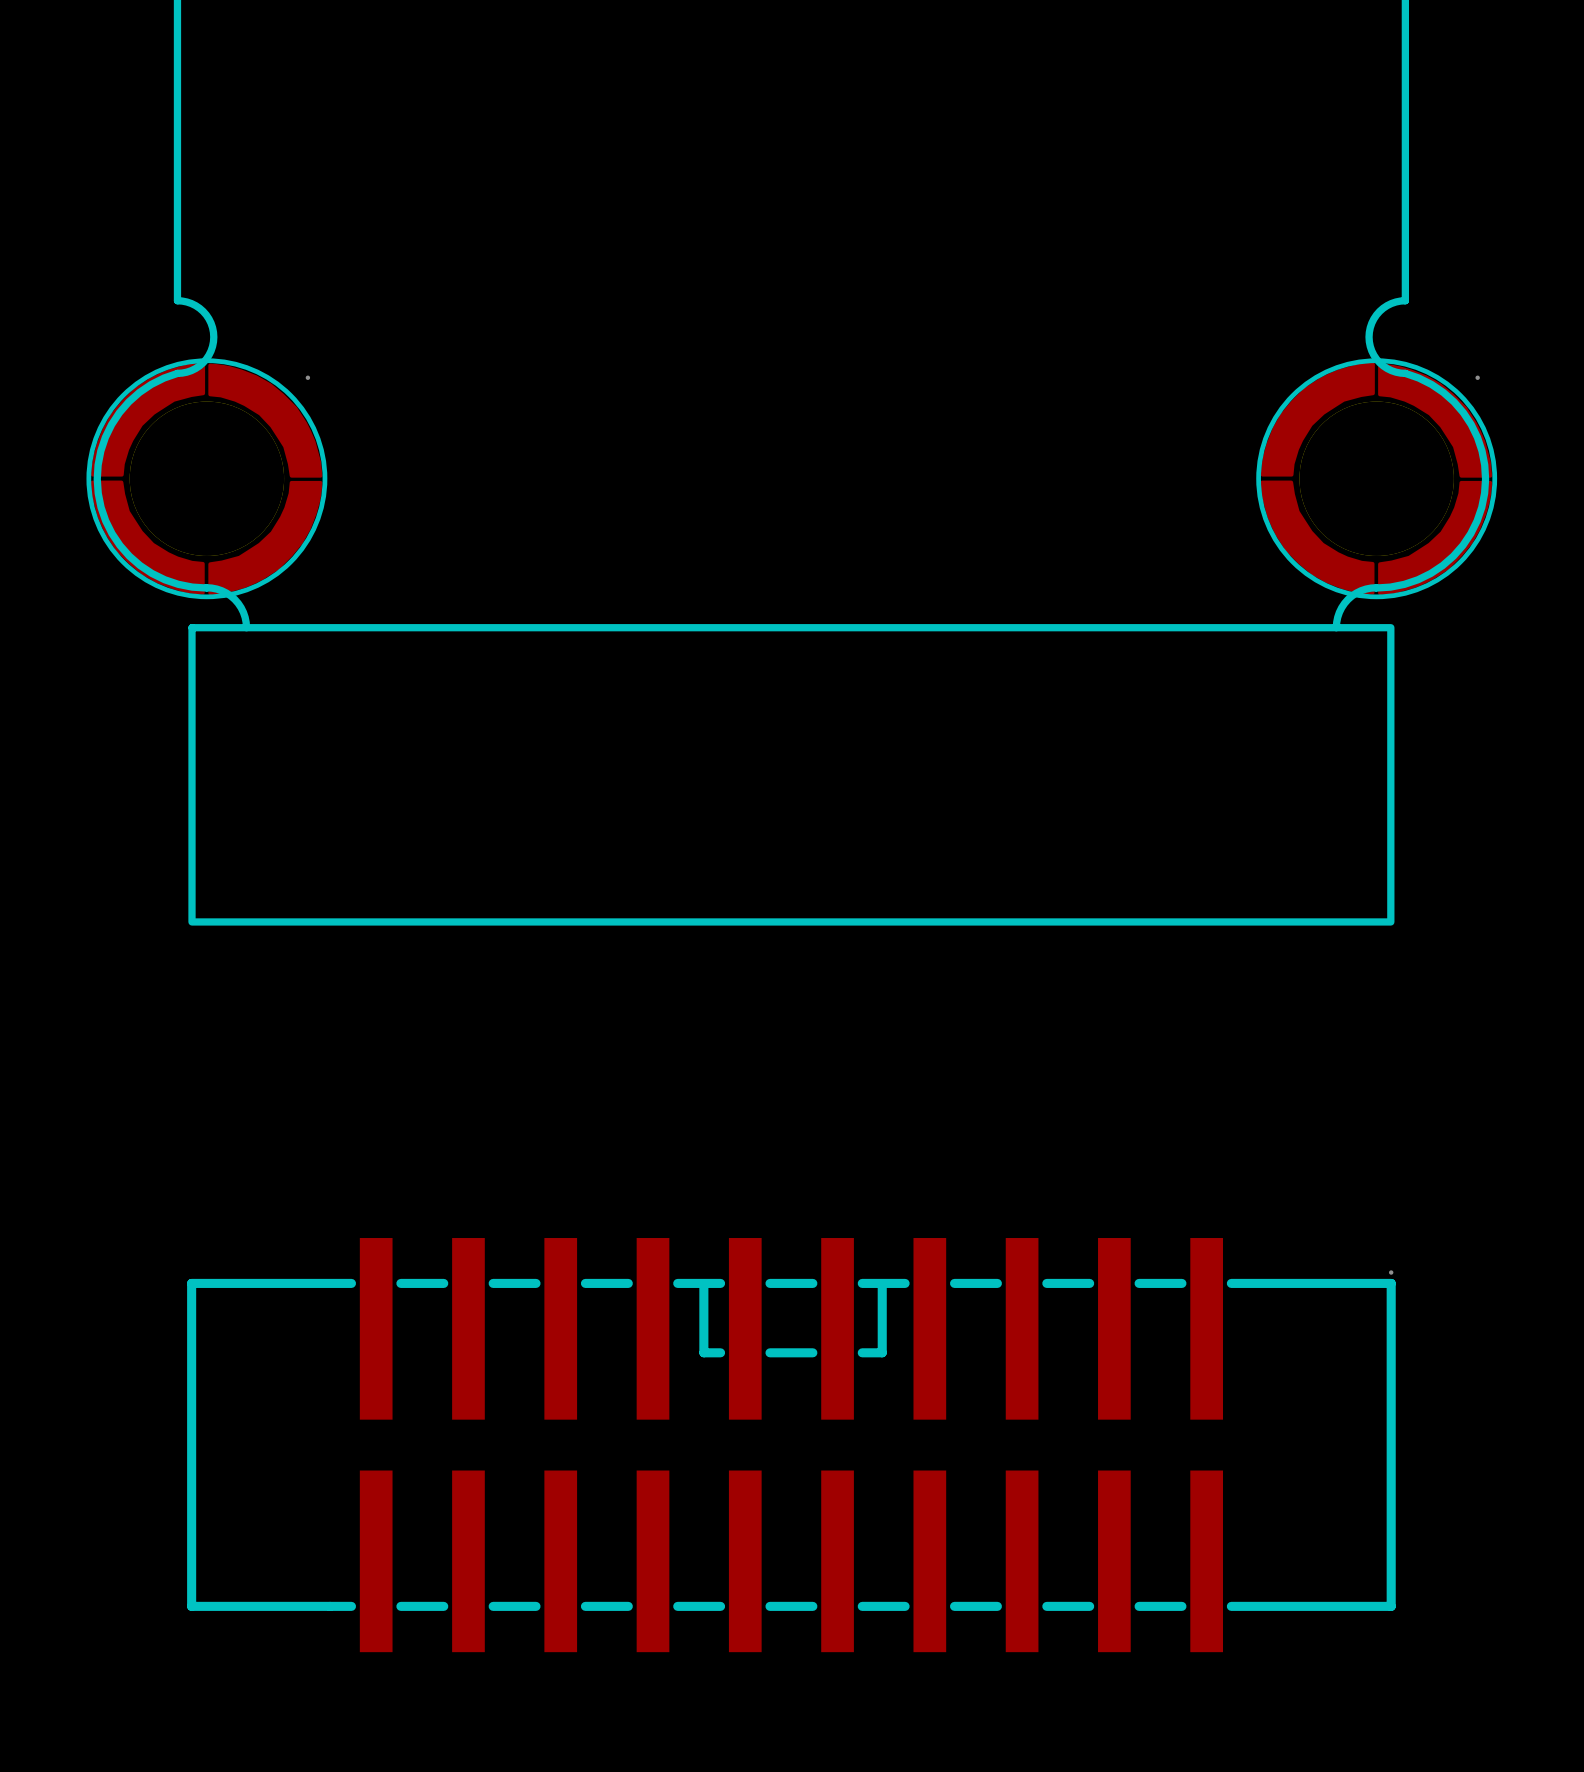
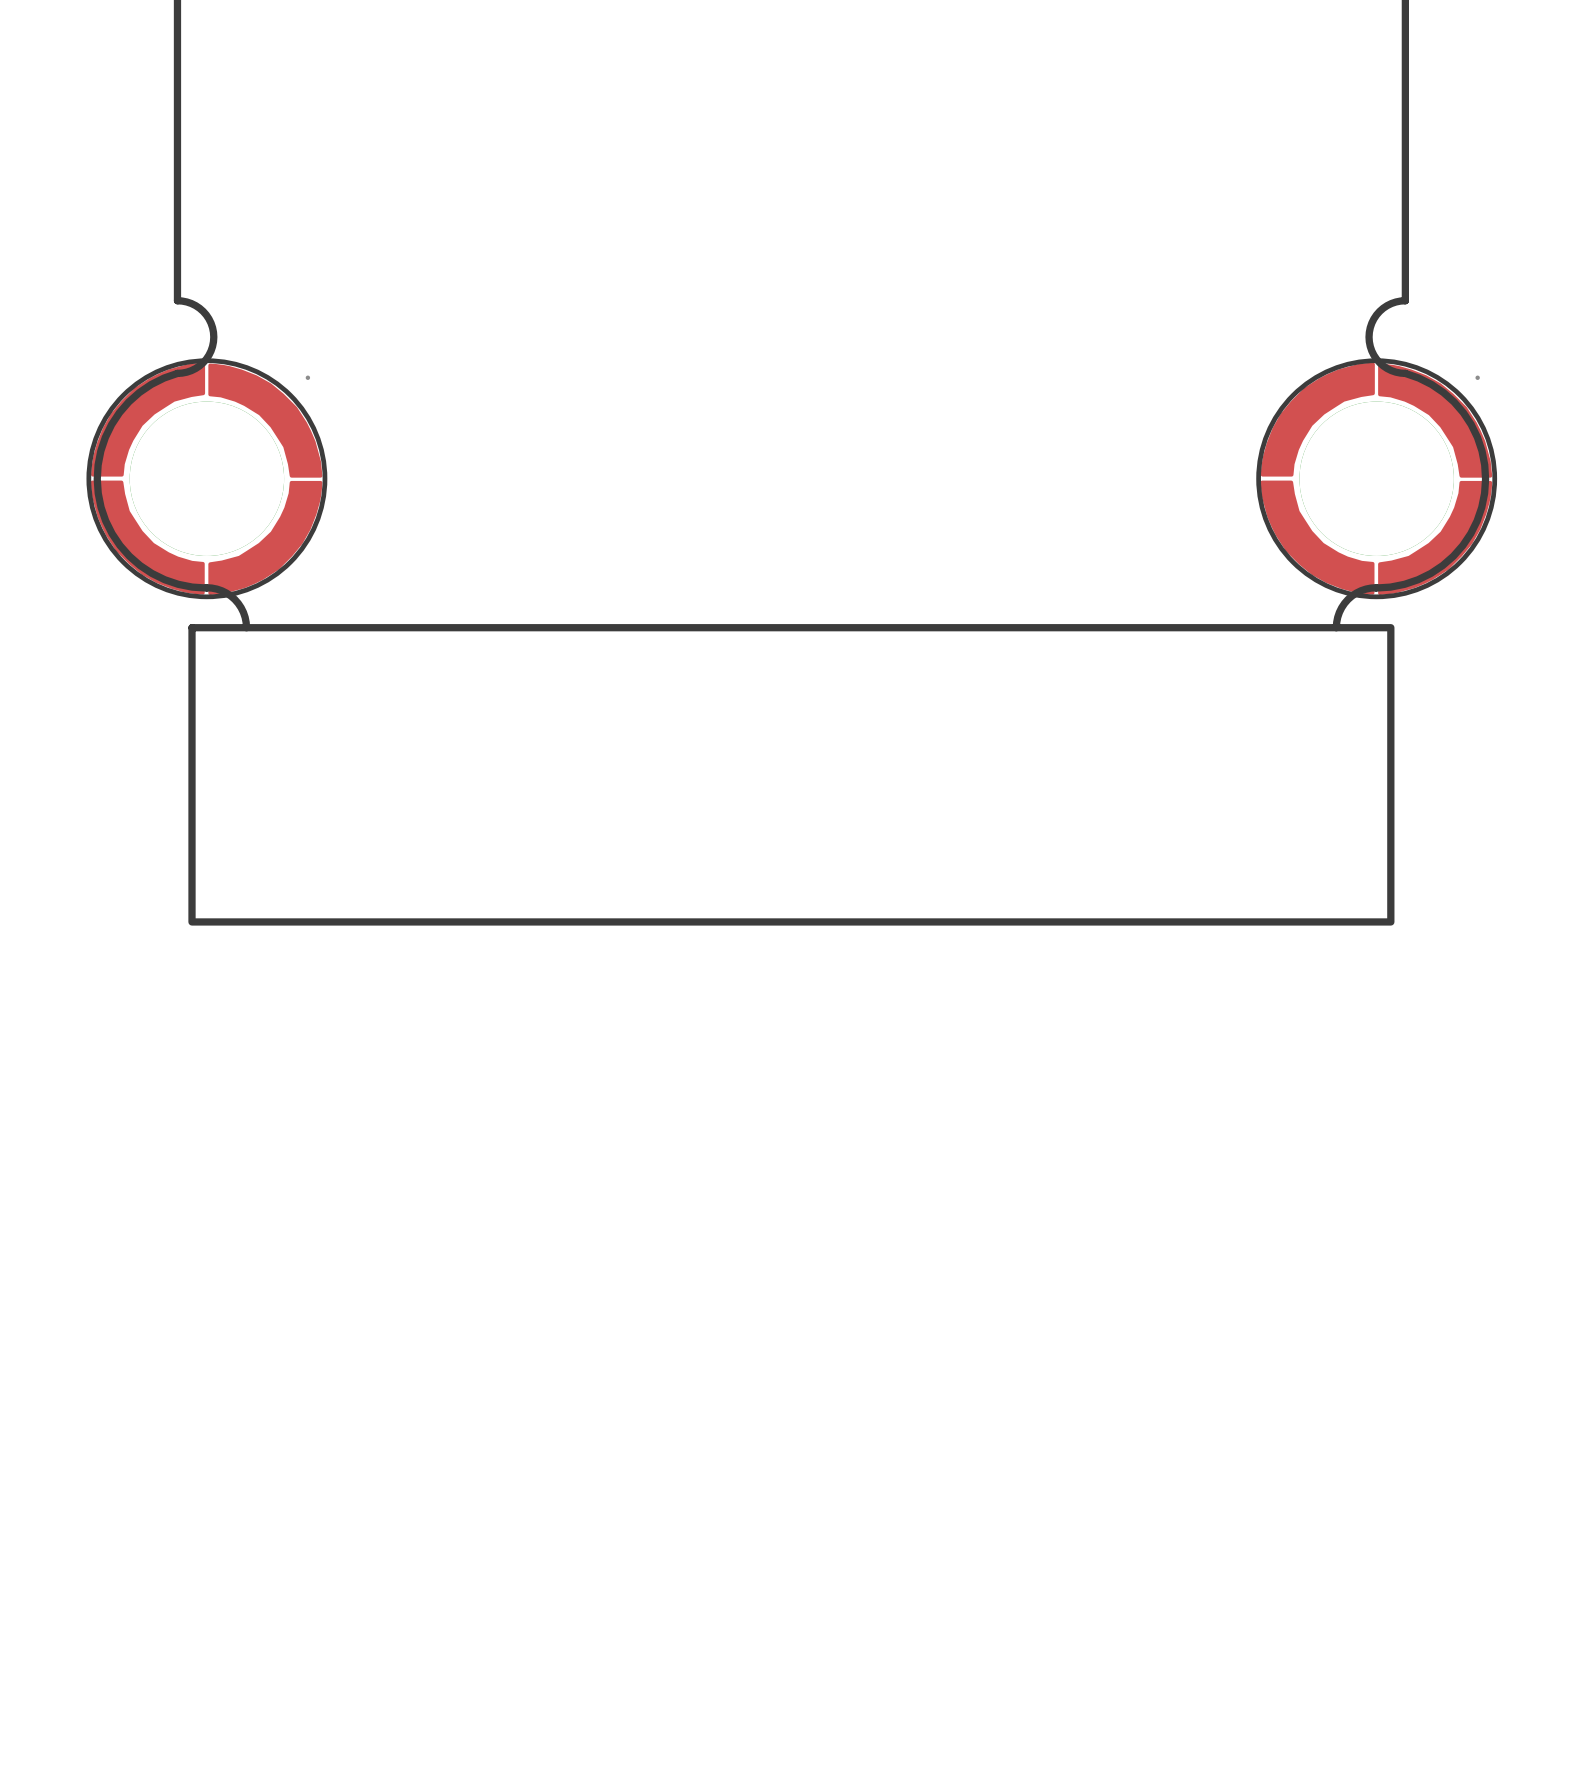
part: (791, 1445) -> none

